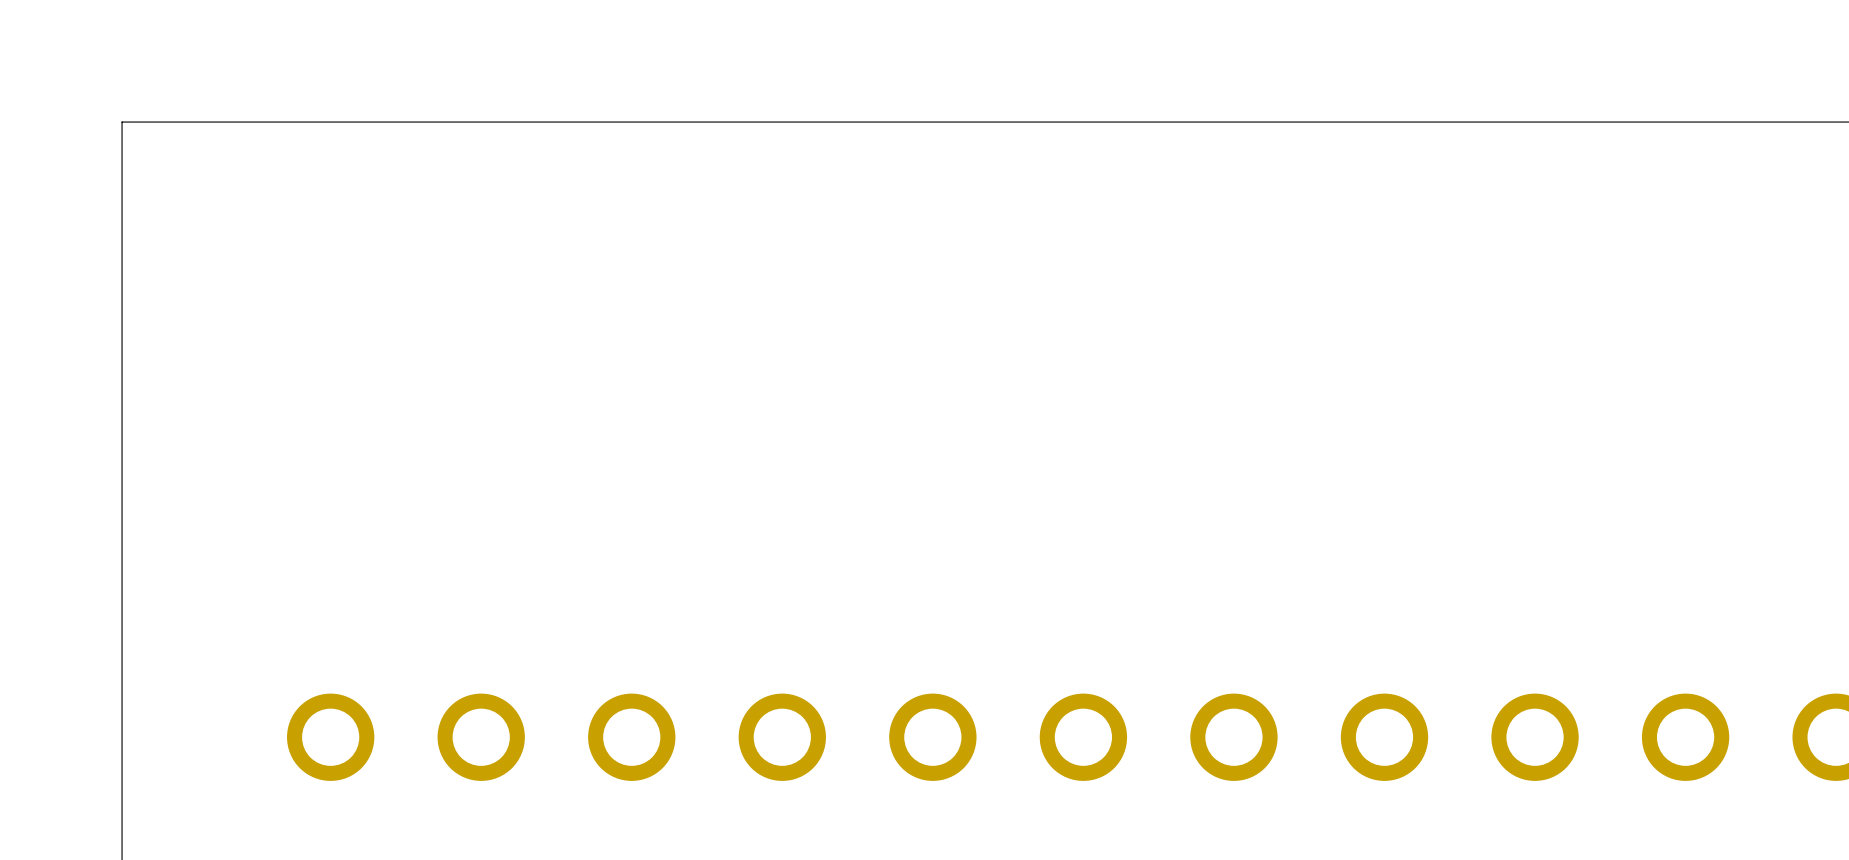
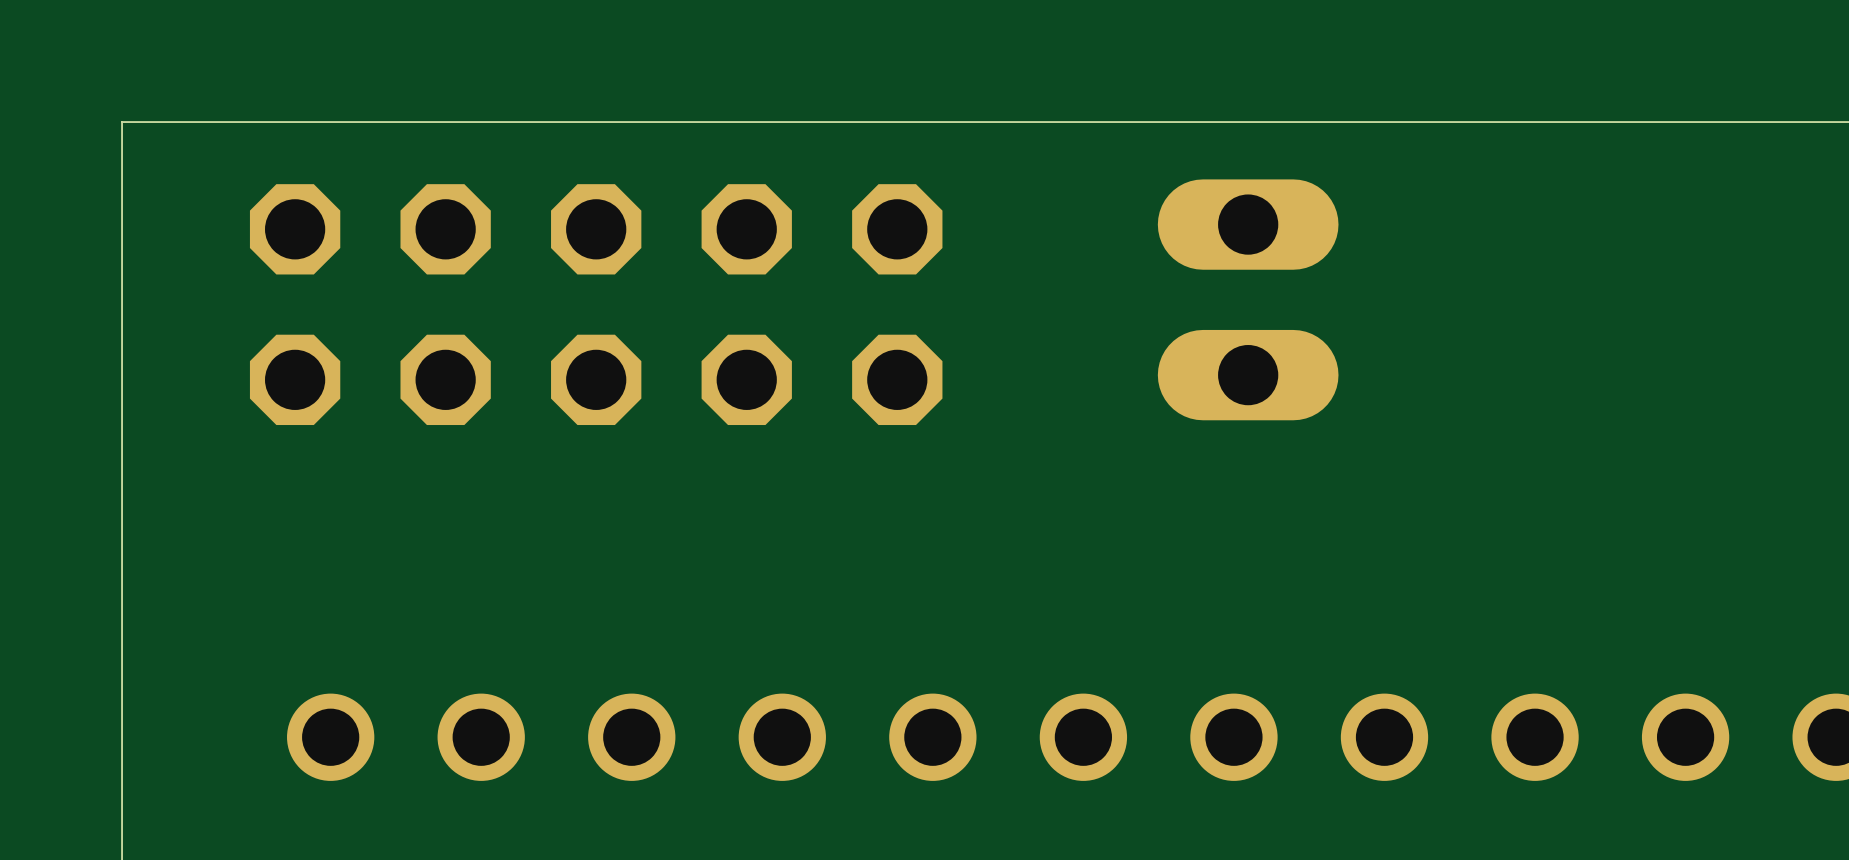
part: none -> (1248, 299)
part: none -> (596, 304)

